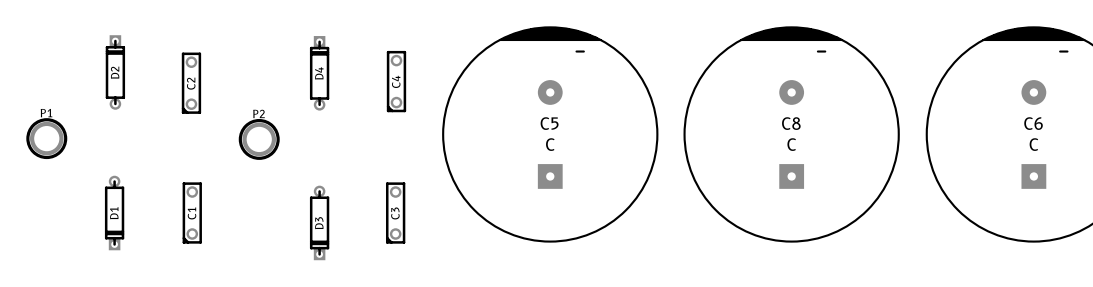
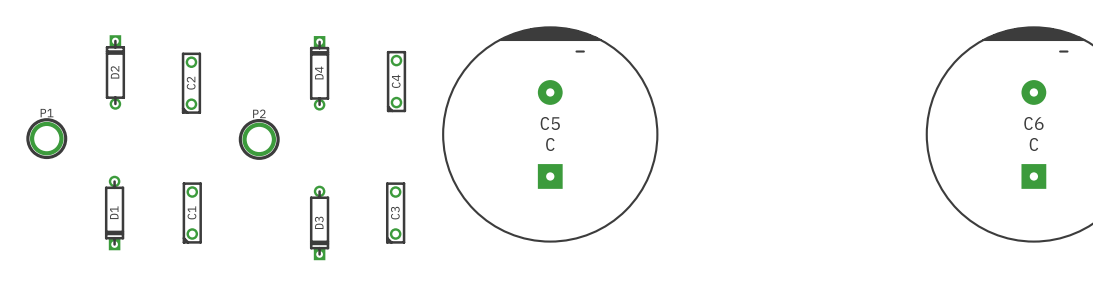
C8: C (791, 134) -> none

